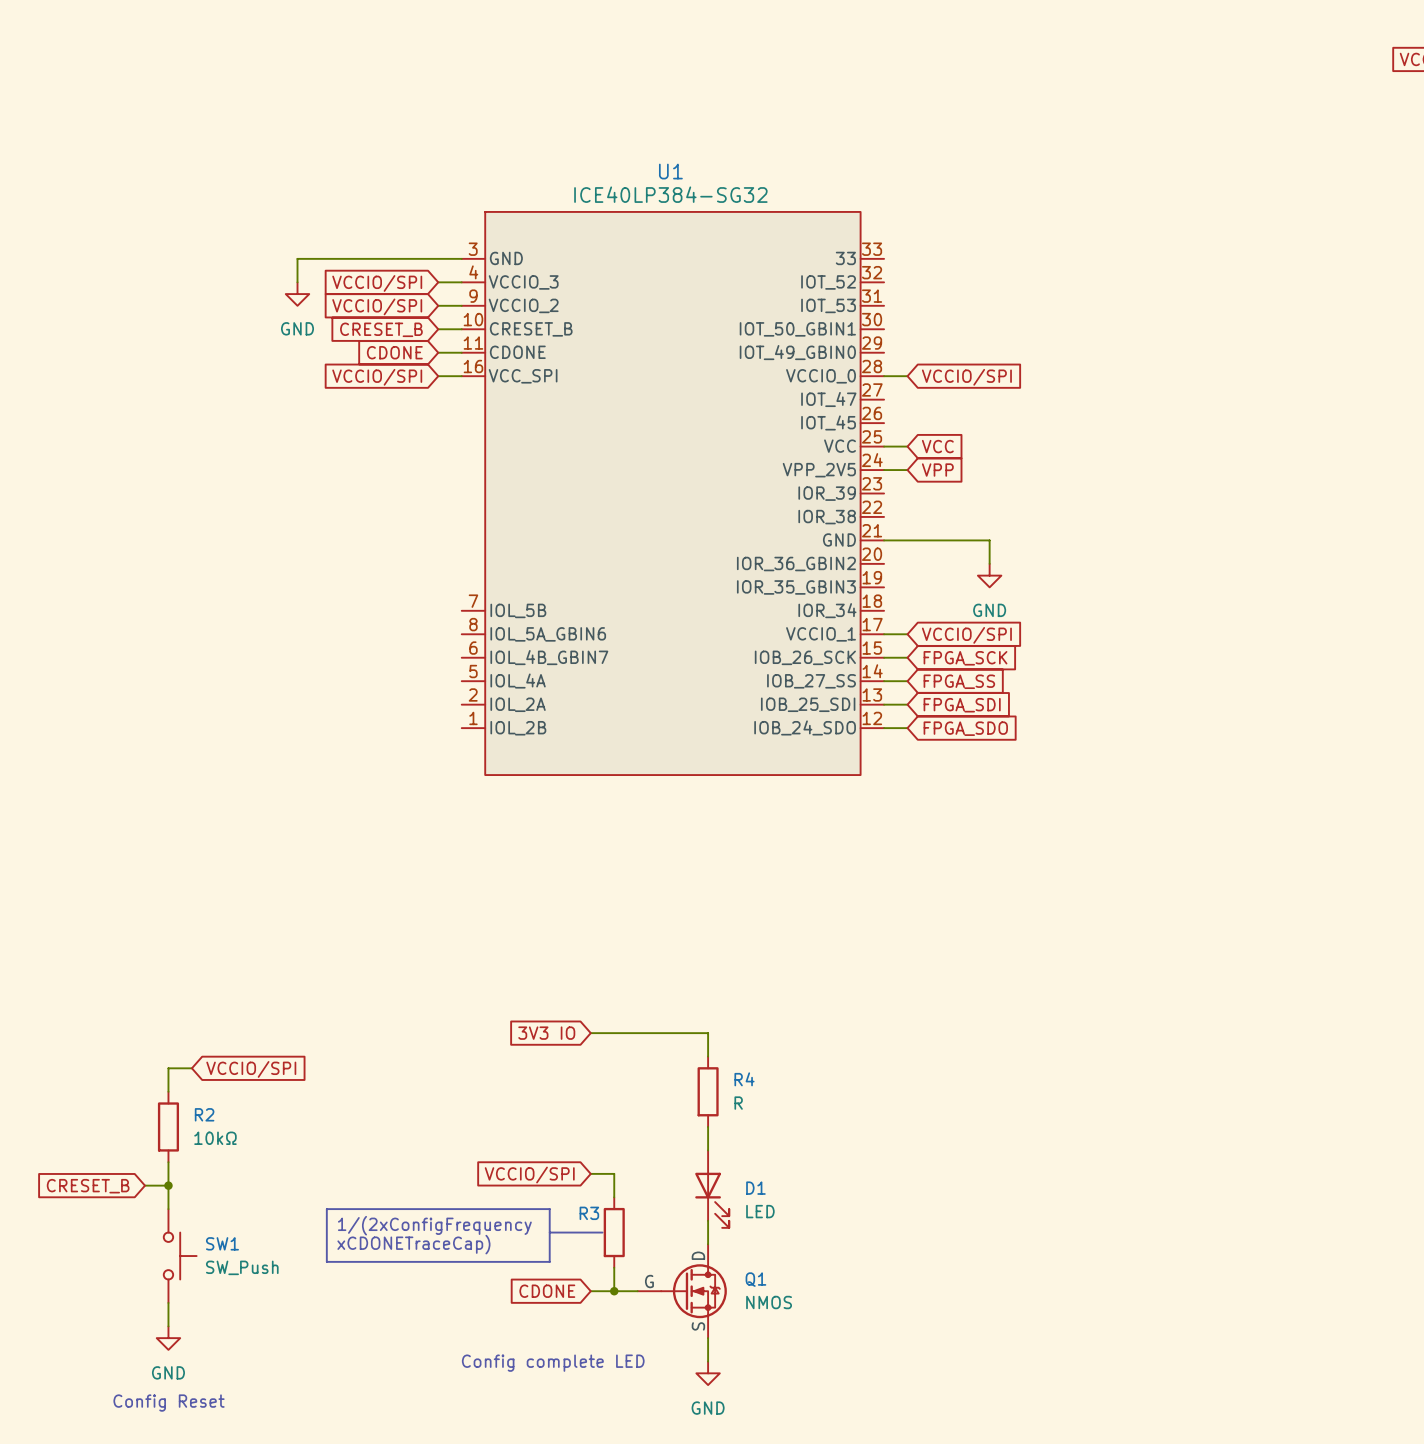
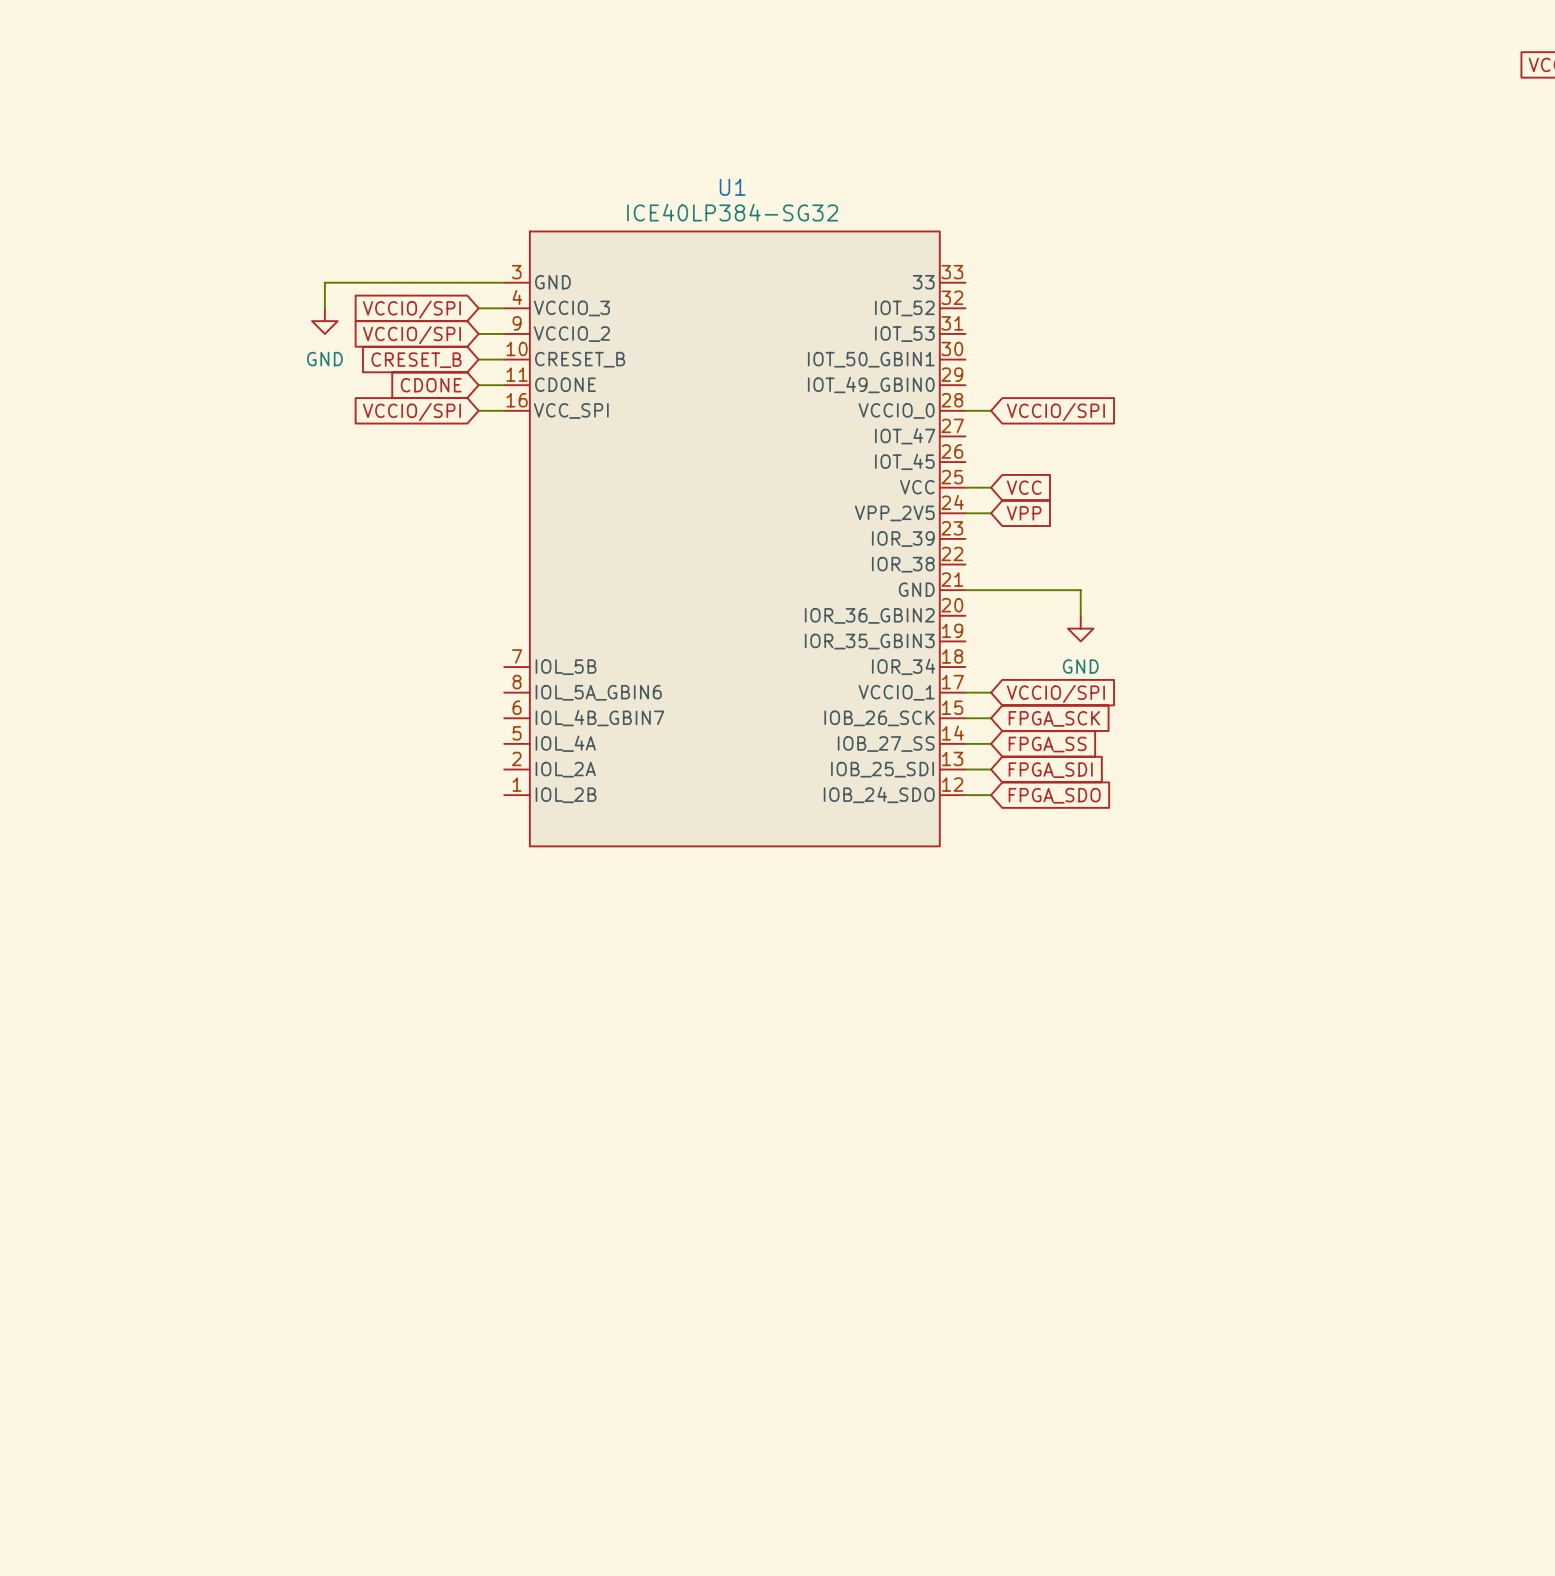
global label: 3V3 IO (546, 1033) -> none
wire: (590, 1033) (708, 1033) (708, 1056) -> none
wire: (191, 1068) (168, 1068) (168, 1091) -> none
global label: VCCIO/SPI (251, 1069) -> none
R4: R (708, 1091) -> none
R2: 10kΩ (168, 1126) -> none
wire: (708, 1126) (708, 1150) -> none
wire: (168, 1162) (168, 1209) -> none
wire: (590, 1173) (614, 1173) (614, 1197) -> none
global label: VCCIO/SPI (529, 1175) -> none
wire: (145, 1185) (168, 1185) -> none
junction: (168, 1185) -> none
global label: CRESET_B (88, 1186) -> none
D1: LED (712, 1189) -> none
line: (326, 1209) (549, 1209) (549, 1261) (326, 1261) (326, 1209) -> none
wire: (708, 1220) (708, 1244) -> none
text: 1/(2xConfigFrequency (434, 1225) -> none
line: (549, 1232) (602, 1232) -> none
R3: (614, 1232) -> none
text: xCDONETraceCap) (413, 1244) -> none
SW1: SW_Push (180, 1256) -> none
wire: (614, 1267) (614, 1291) -> none
global label: CDONE (547, 1291) -> none
wire: (590, 1291) (637, 1291) -> none
junction: (614, 1291) -> none
Q1: NMOS (682, 1291) -> none
wire: (168, 1302) (168, 1326) -> none
power symbol: GND (168, 1338) -> none
wire: (708, 1338) (708, 1361) -> none
text: Config complete LED (553, 1363) -> none
power symbol: GND (708, 1373) -> none
text: Config Reset (169, 1403) -> none

